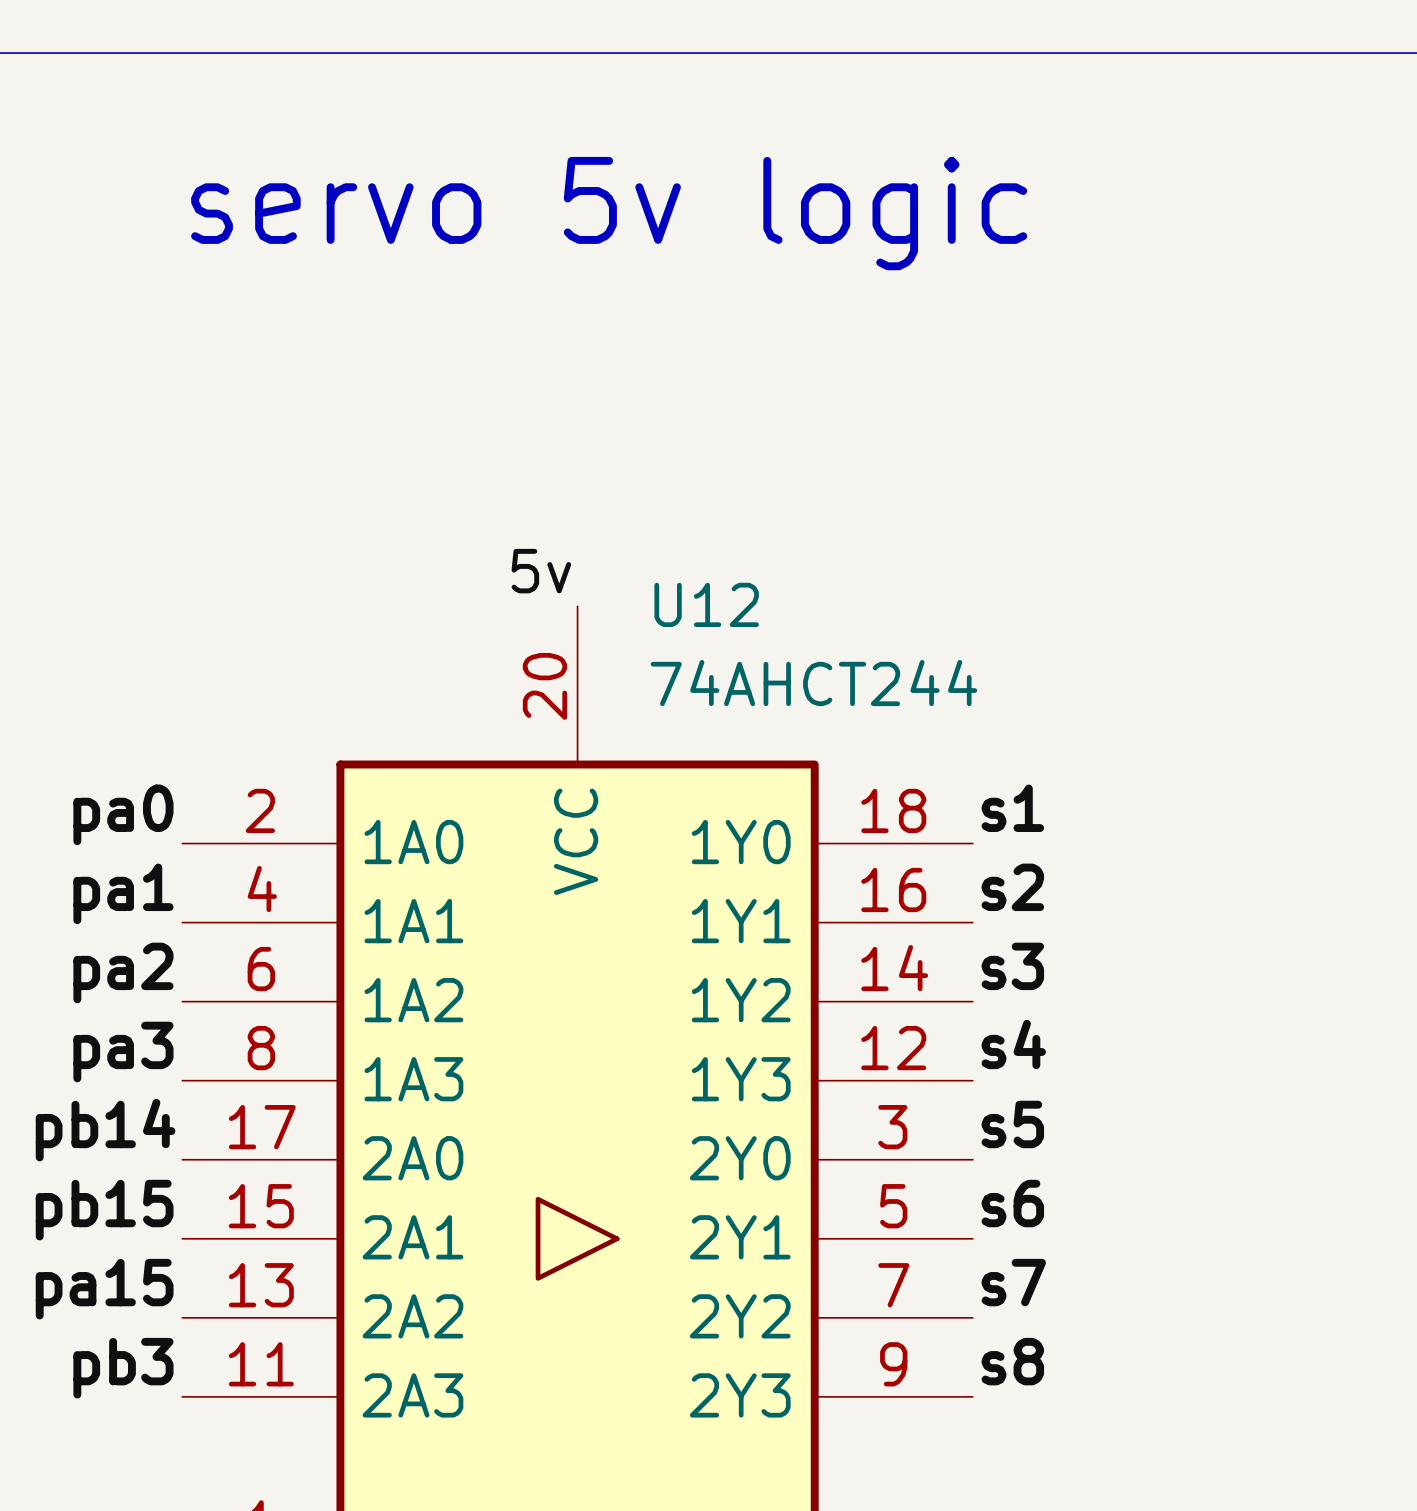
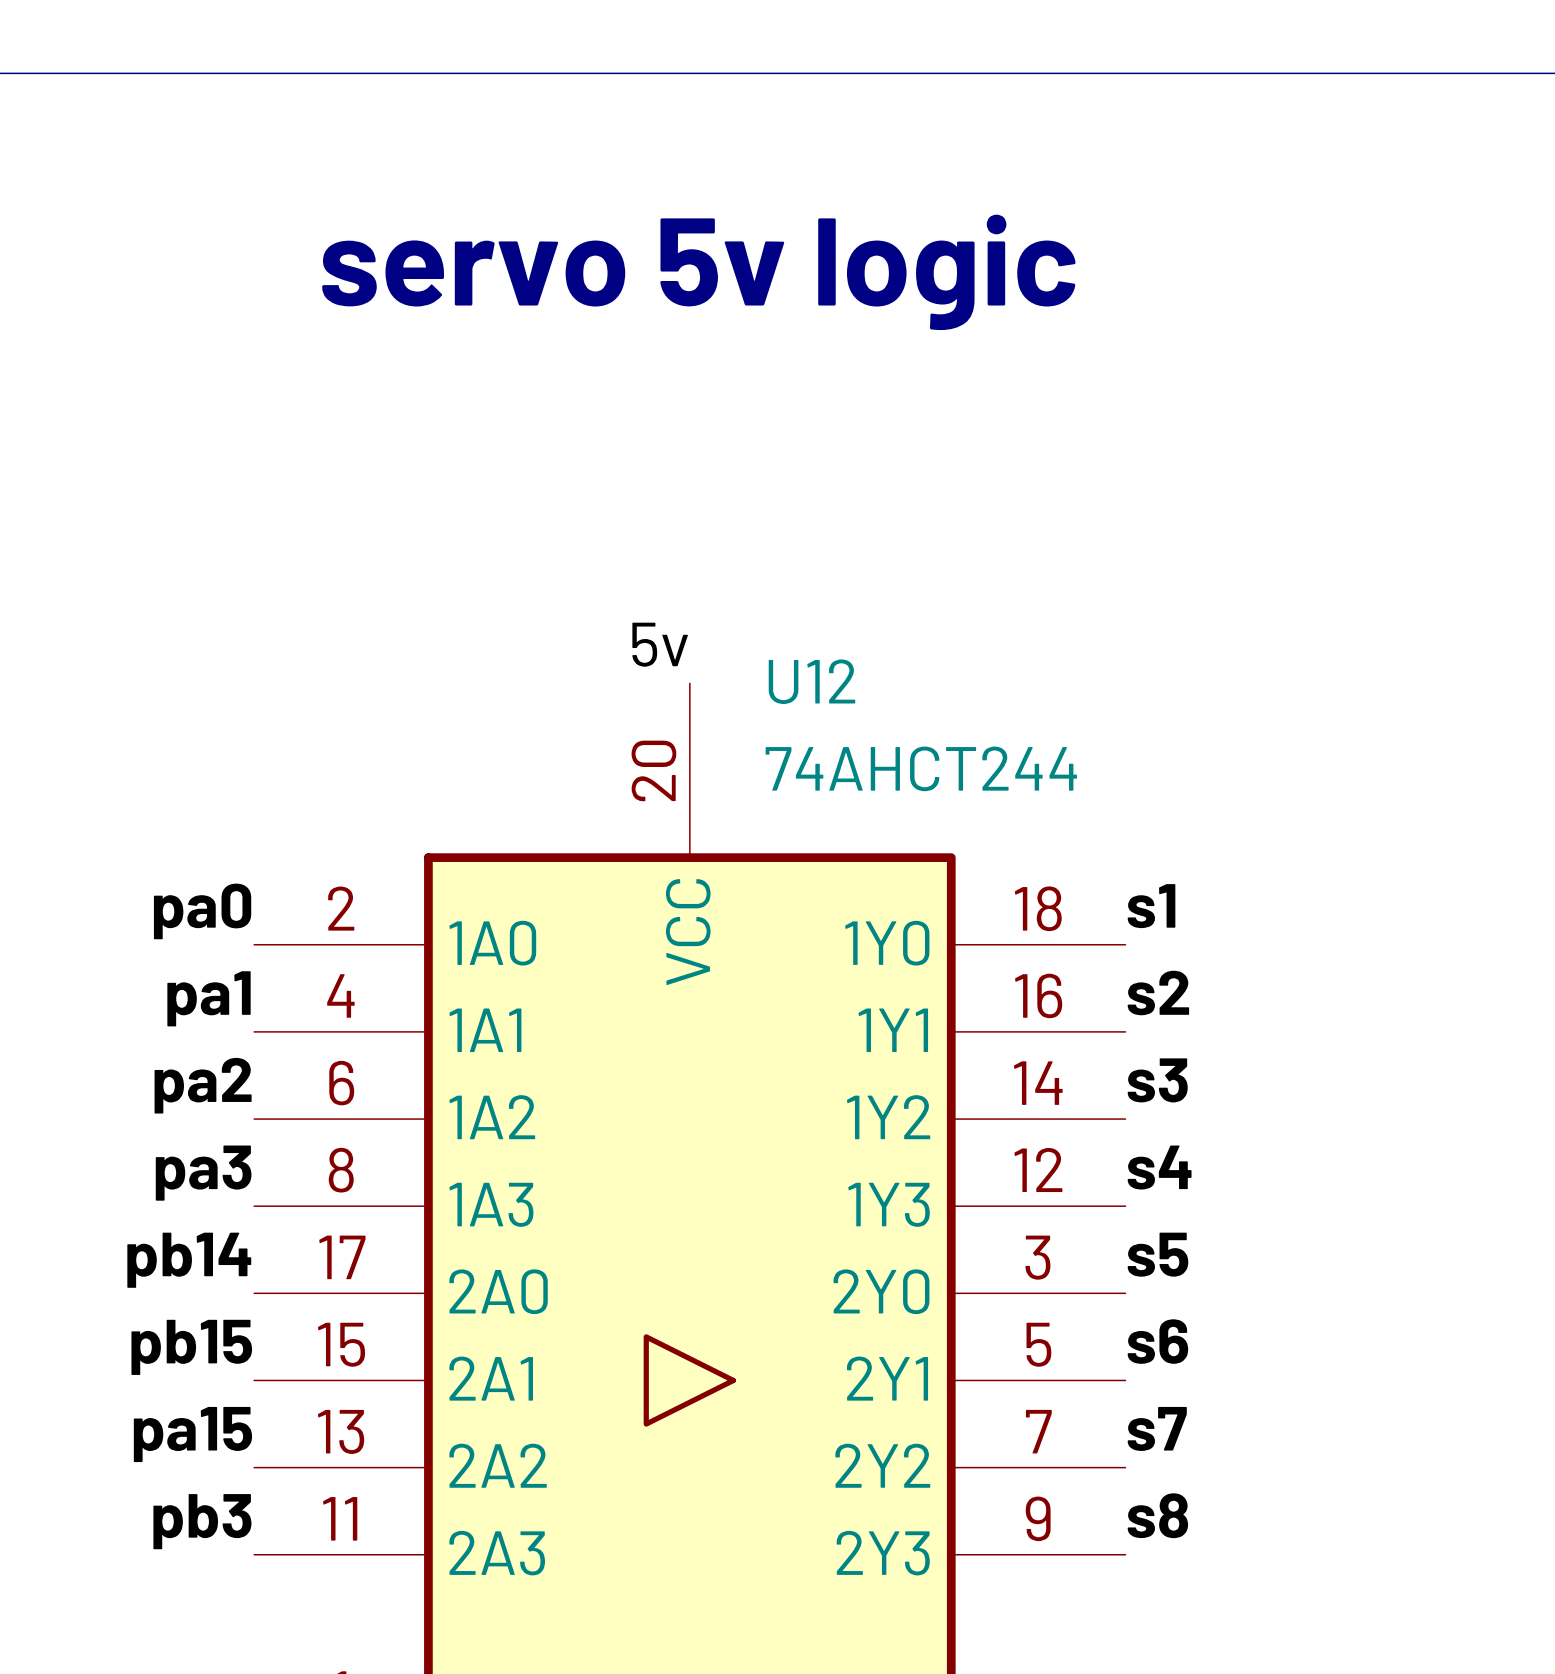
text position: servo 5v logic (609, 213) -> servo 5v logic (698, 272)

